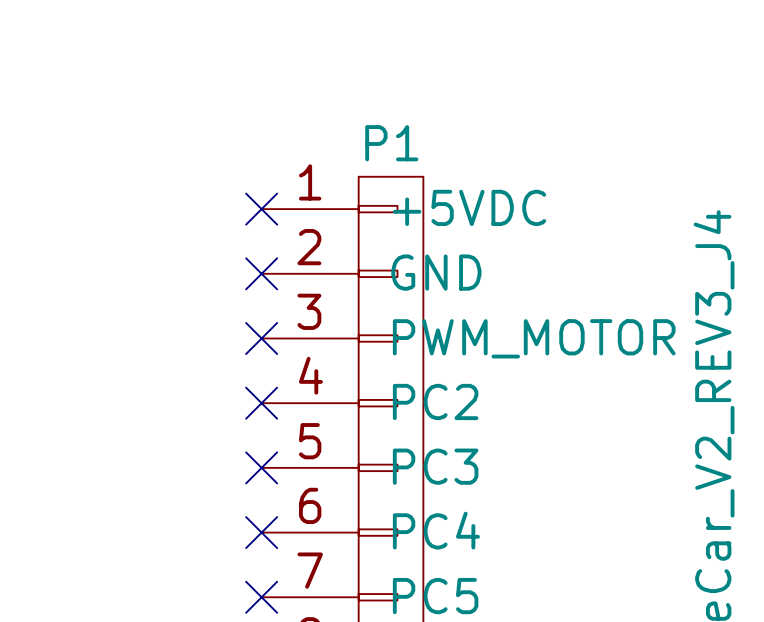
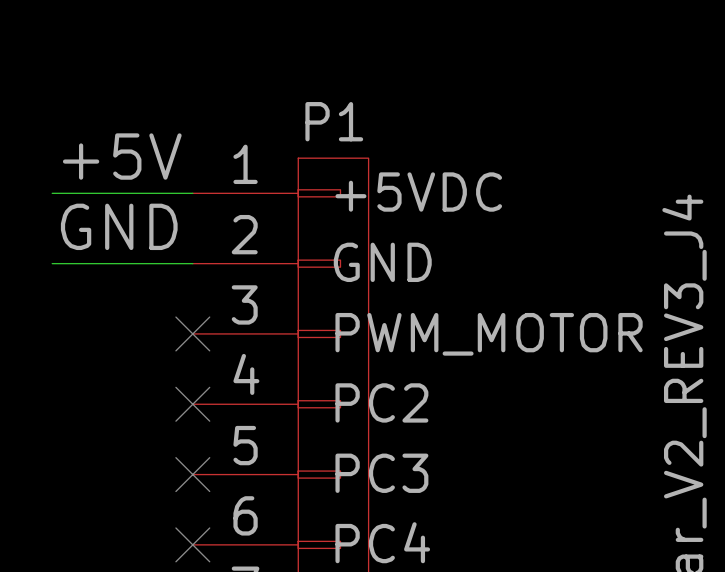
label: none -> +5V (122, 156)
wire: none -> (52, 193) (192, 193)
no-connect mark: (261, 209) -> none
label: none -> GND (119, 226)
wire: none -> (52, 263) (192, 263)
no-connect mark: (261, 273) -> none

